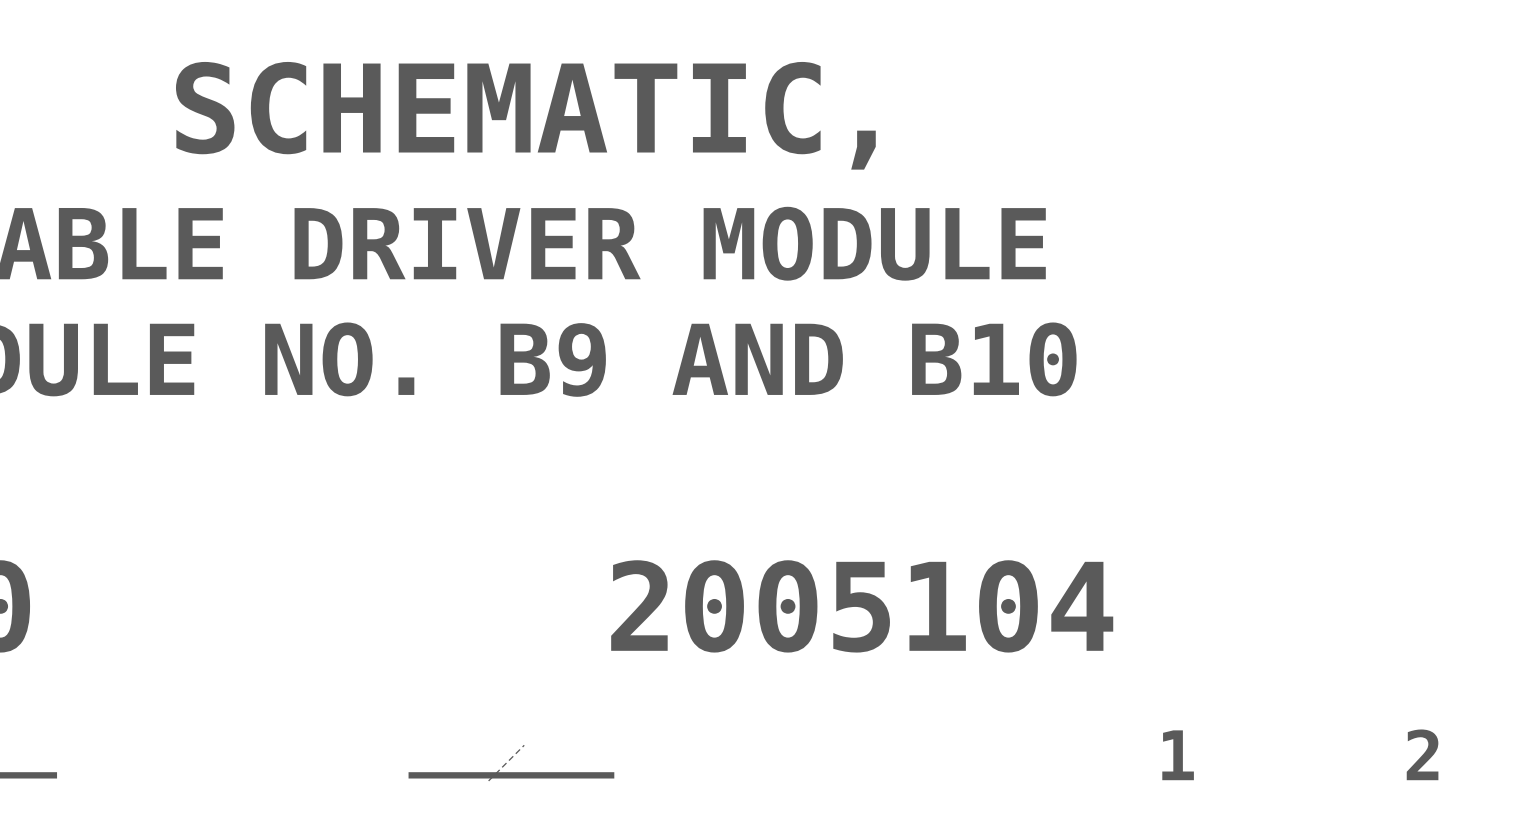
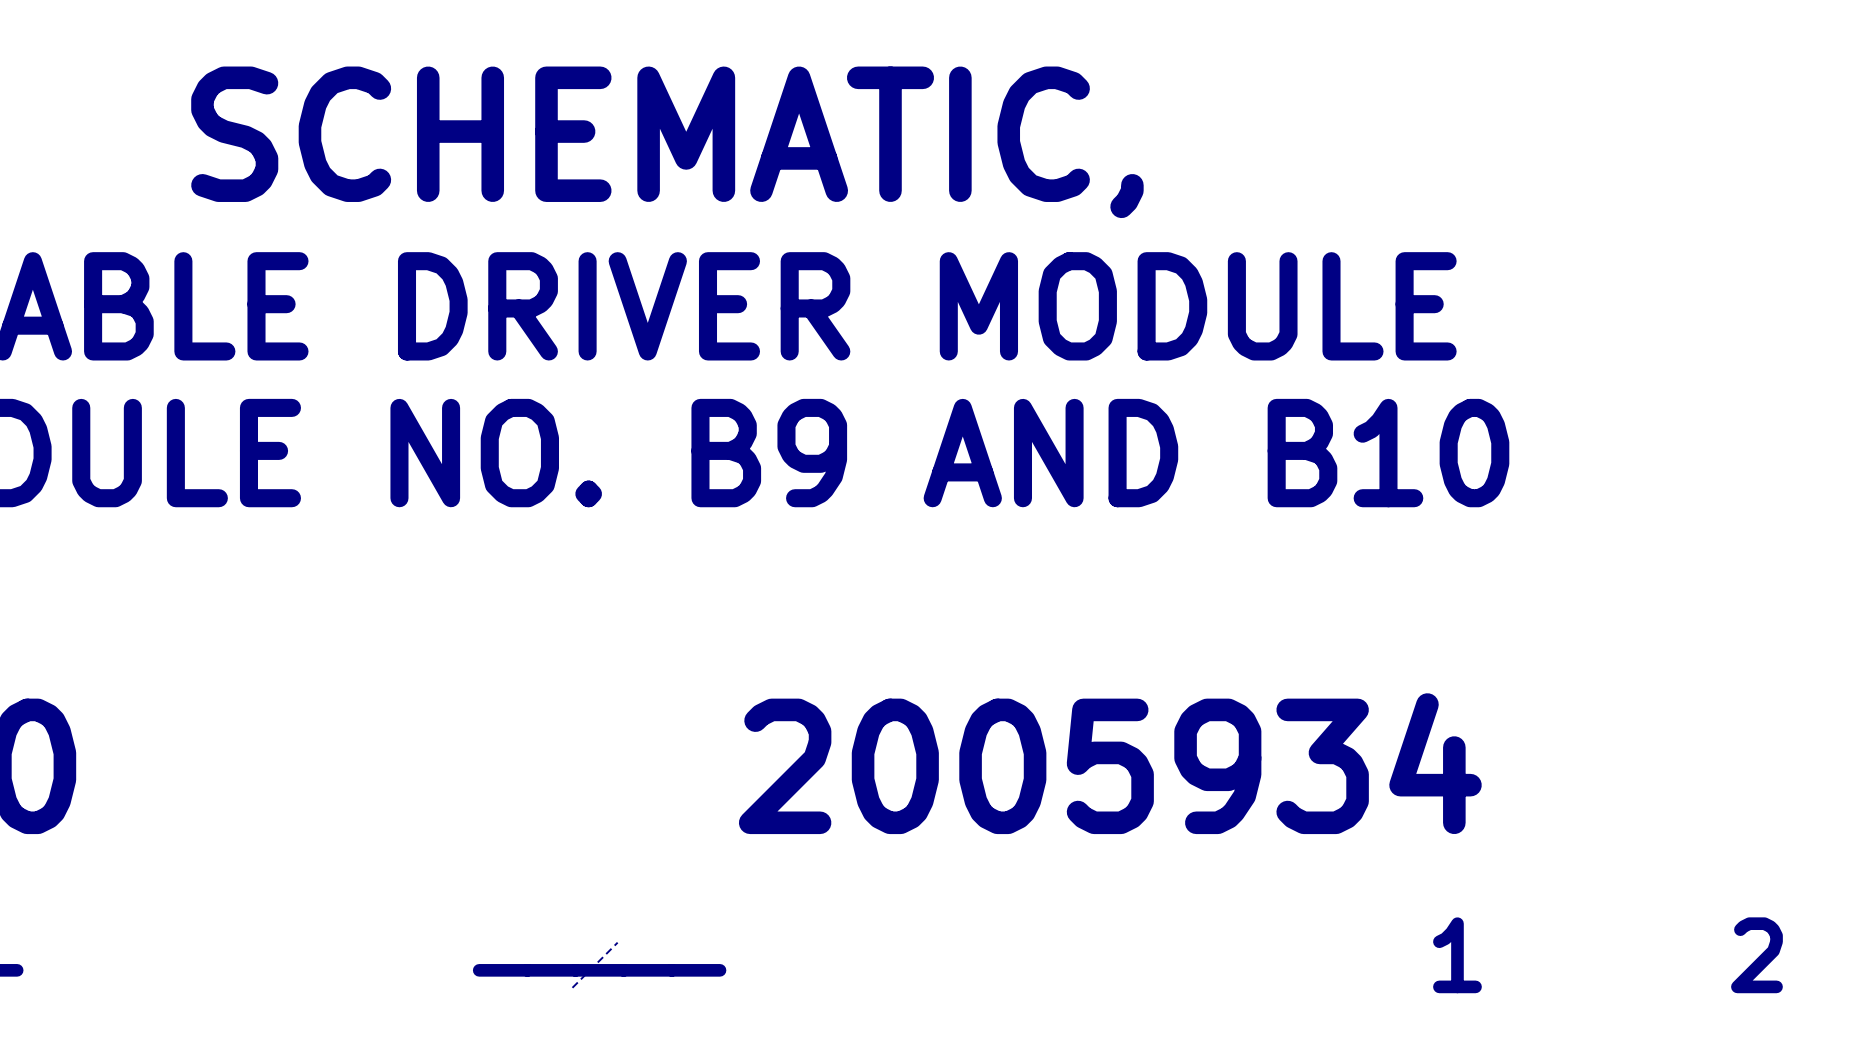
text: 2005104 (862, 606) -> 2005934 (1110, 763)

